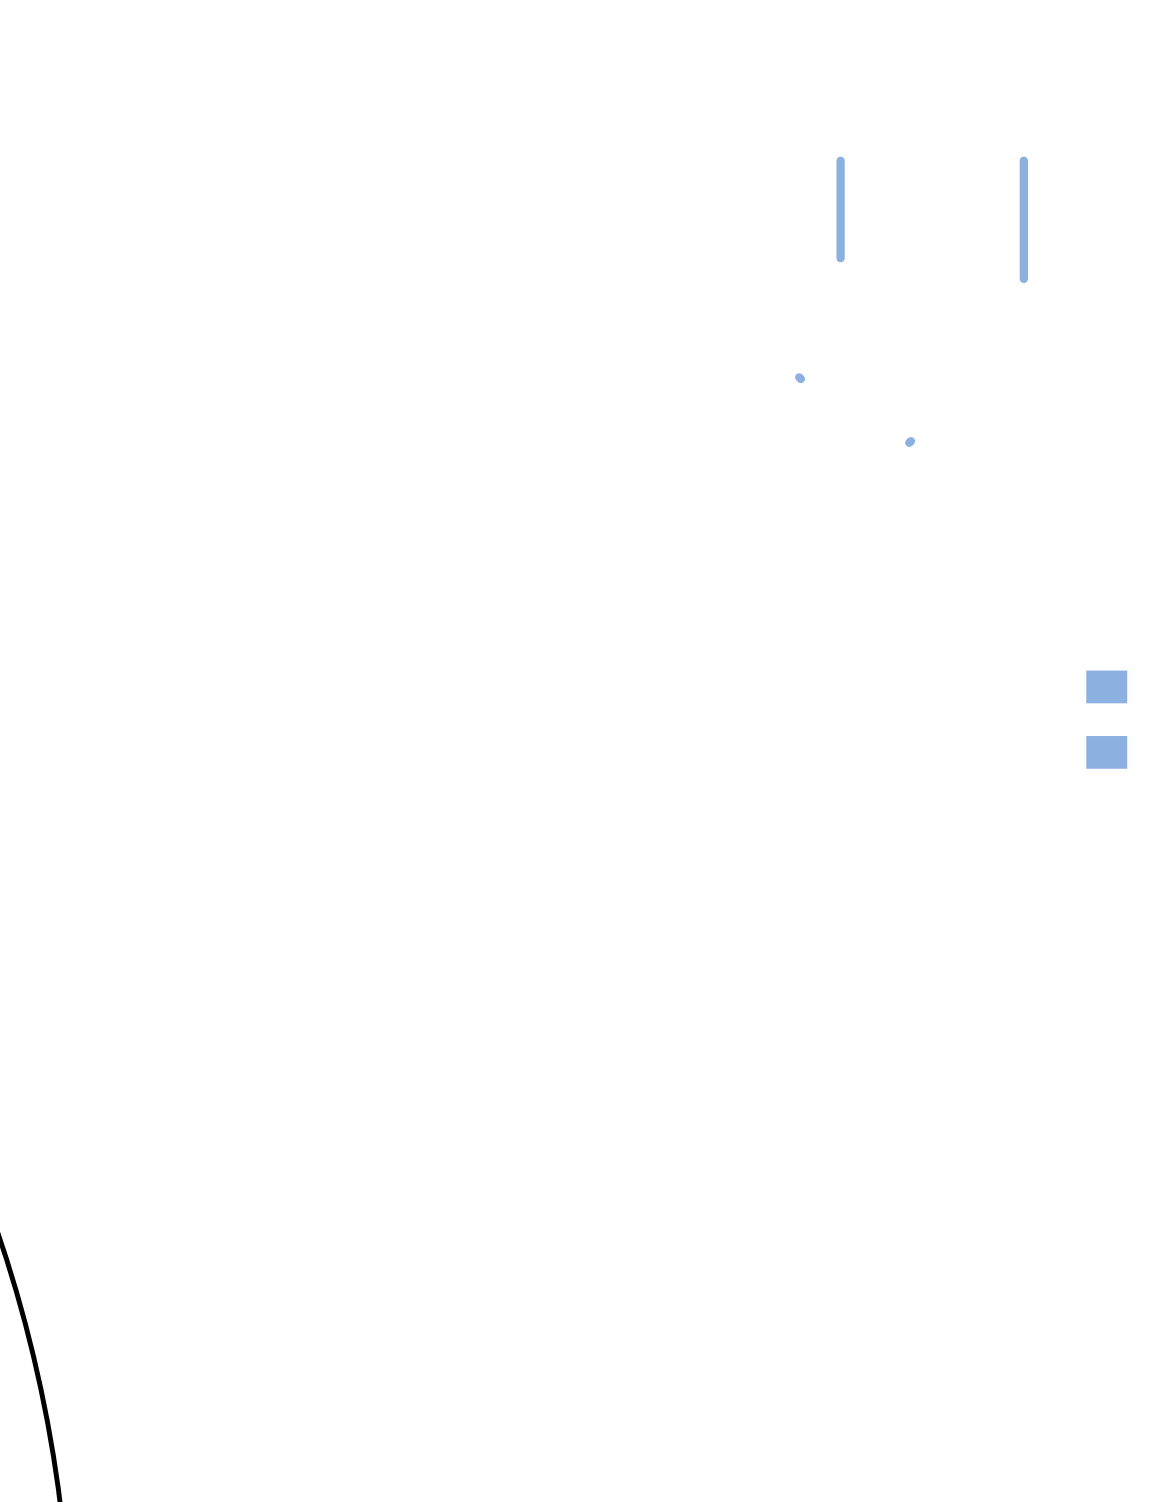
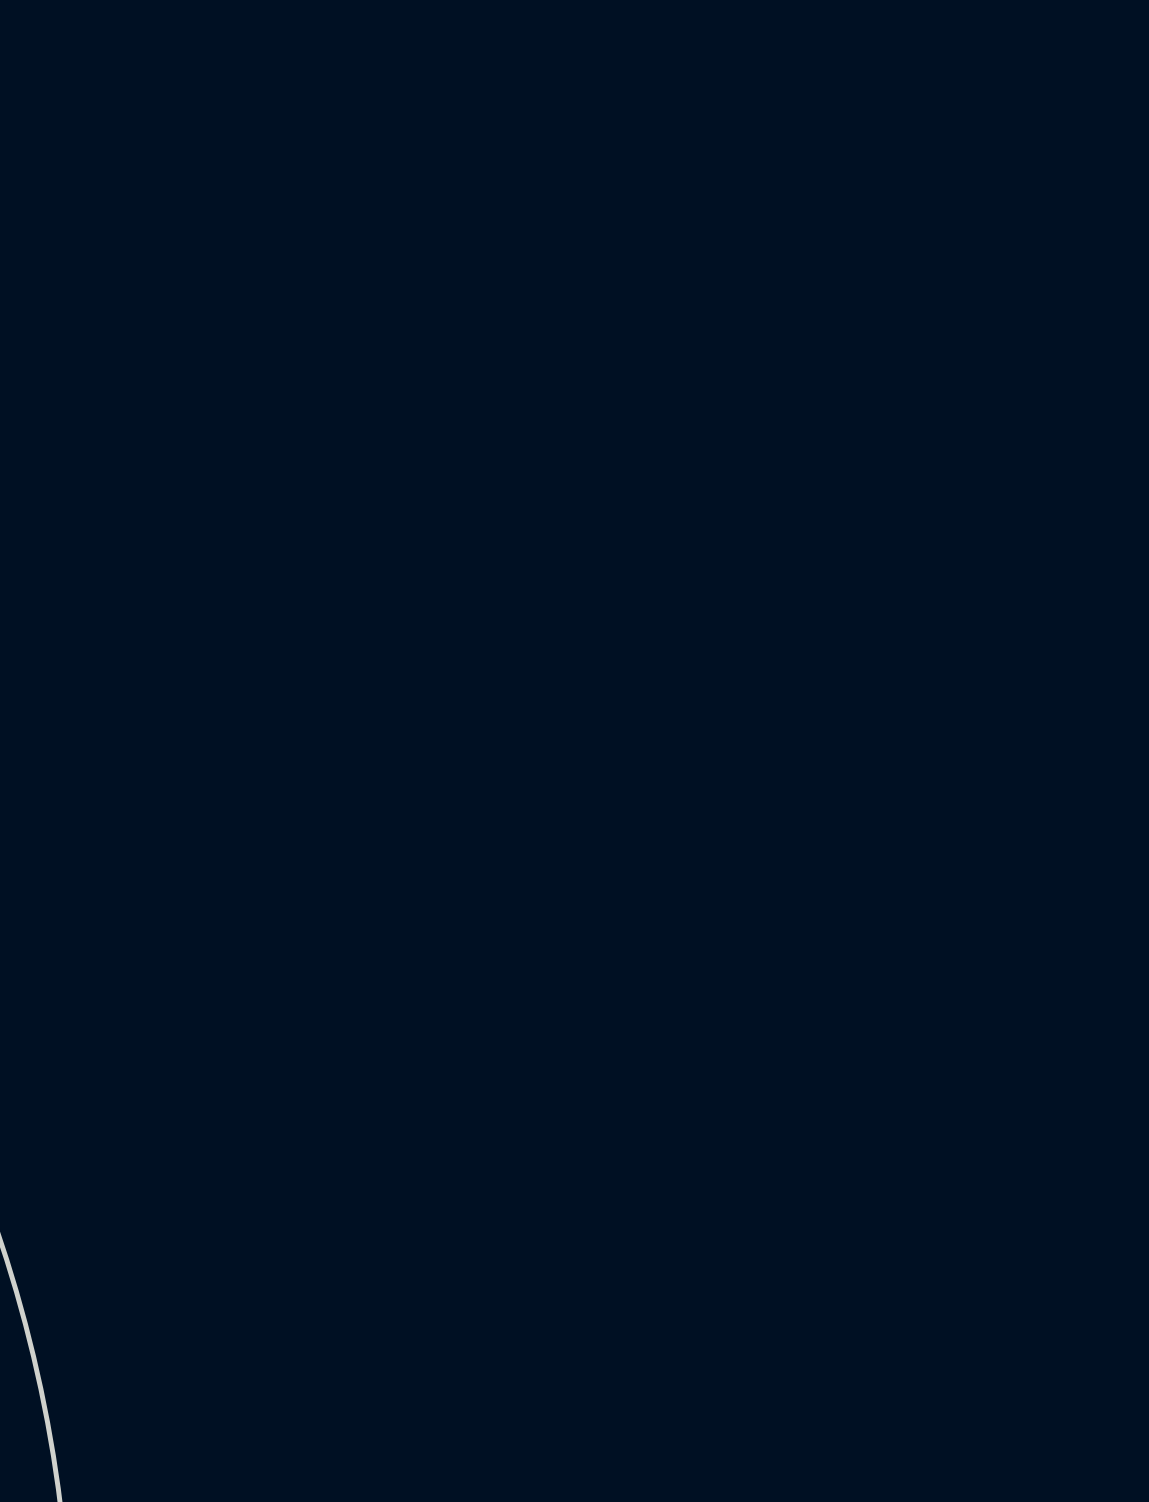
bottom track: (840, 160) (840, 258) -> none
bottom track: (1023, 160) (1023, 278) -> none
bottom track: (799, 377) (800, 378) -> none
bottom track: (910, 441) (909, 442) -> none
part: (1106, 719) -> none

